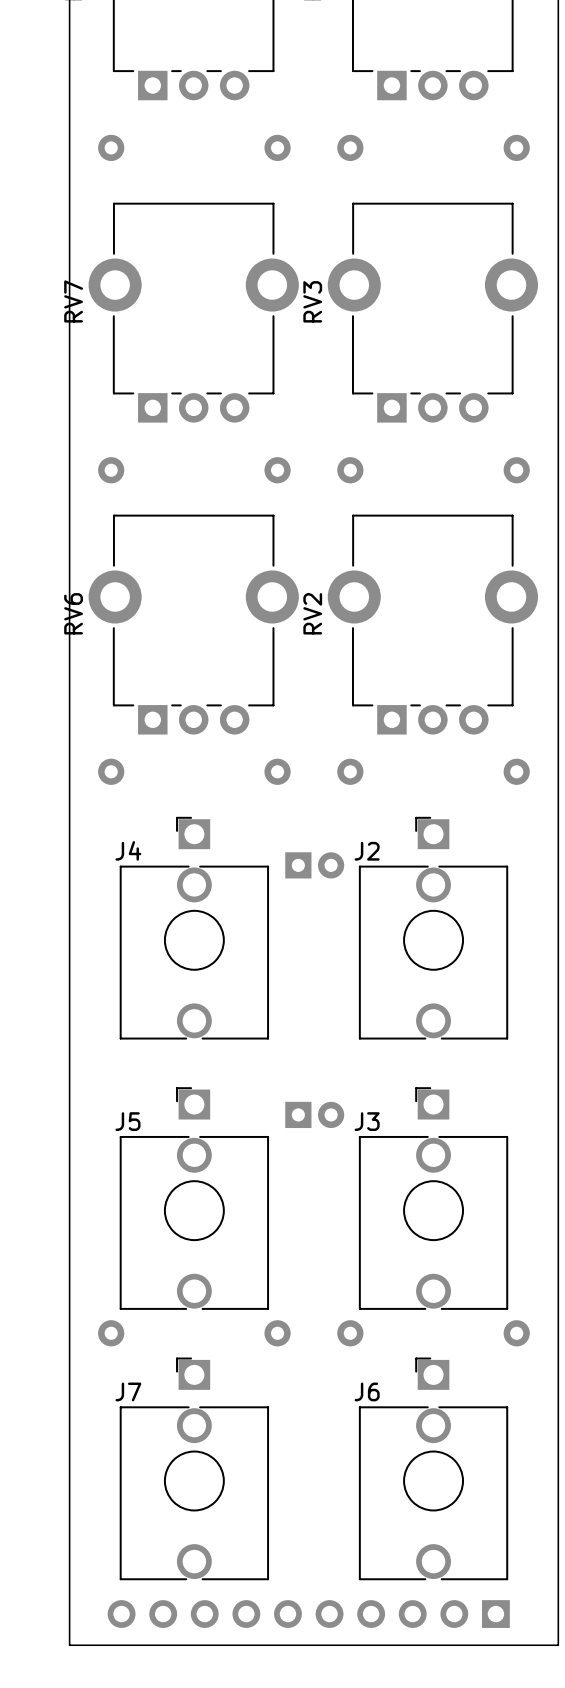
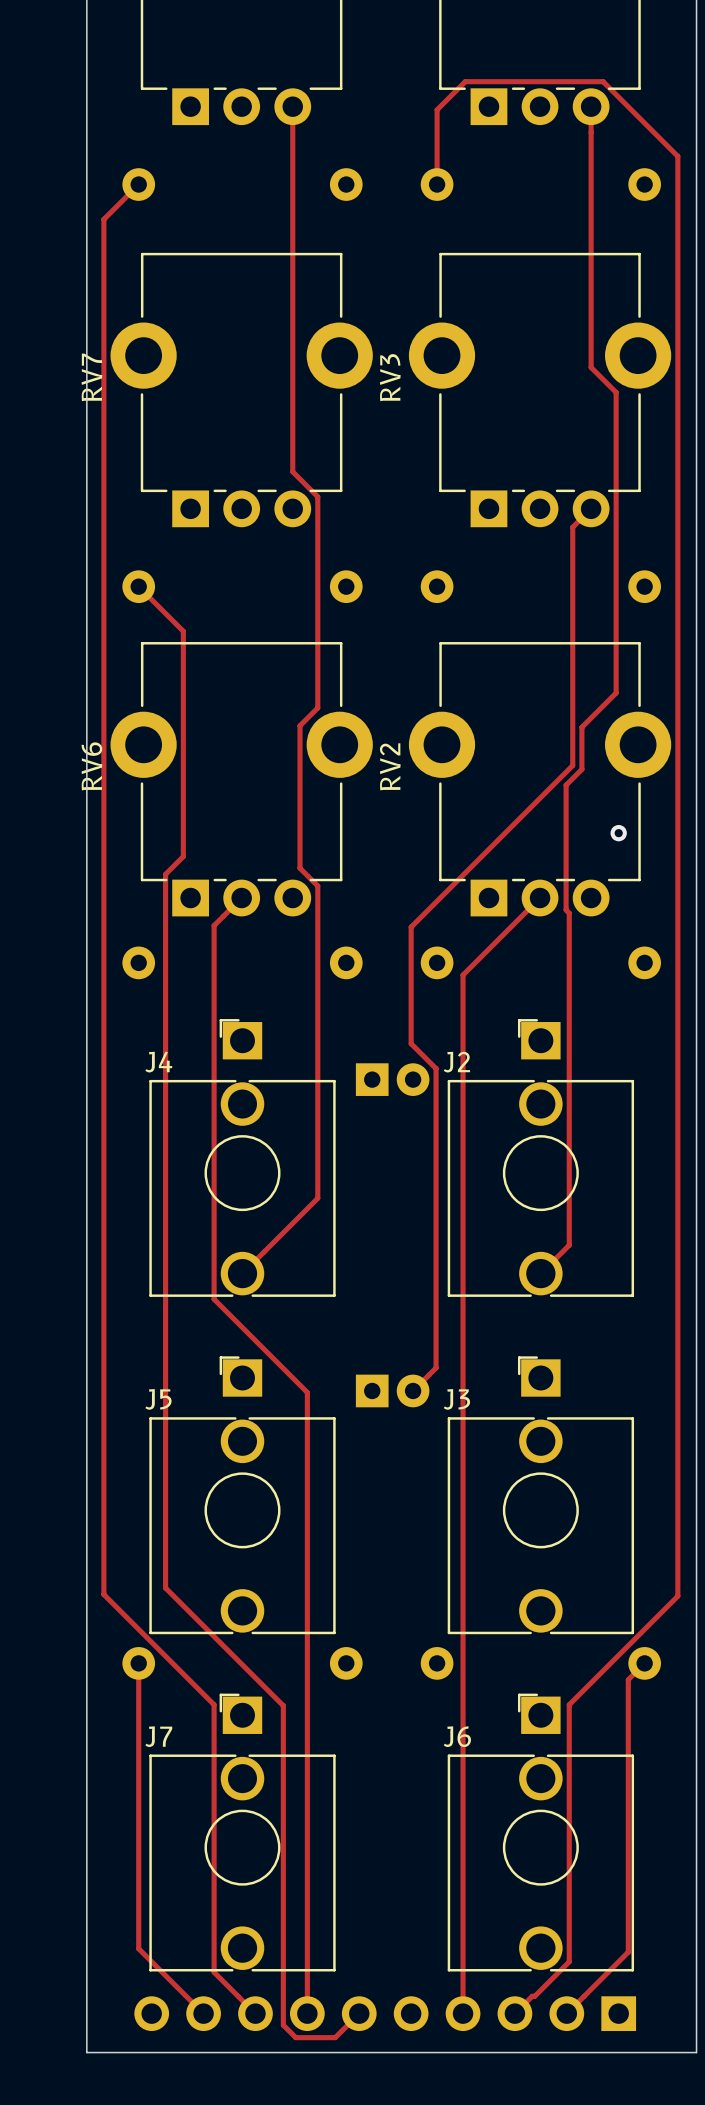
track: none -> (292, 106) (292, 471) (317, 496) (317, 707) (300, 725) (300, 868) (317, 886) (317, 1198) (242, 1273)
track: none -> (591, 106) (591, 367) (616, 392) (616, 693) (581, 727) (581, 769) (566, 785) (566, 910) (569, 913) (569, 1245) (540, 1273)
track: none -> (138, 184) (103, 219) (103, 1594) (214, 1704) (214, 1972) (255, 2013)
track: none -> (437, 184) (437, 109) (465, 81) (603, 81) (677, 156) (677, 1596) (569, 1704) (569, 1961) (514, 2013)
track: none -> (591, 508) (572, 527) (572, 765) (411, 927) (411, 1043) (436, 1068) (436, 1367) (413, 1390)
track: none -> (138, 586) (183, 631) (183, 856) (165, 874) (165, 1588) (283, 1705) (283, 2025) (295, 2037) (335, 2037) (359, 2013)
via: none -> (618, 833)
track: none -> (241, 898) (214, 925) (214, 1299) (307, 1392) (307, 2013)
track: none -> (540, 898) (463, 975) (463, 2013)
track: none -> (138, 1663) (138, 1948) (203, 2013)
track: none -> (644, 1663) (628, 1679) (628, 1952) (566, 2013)

